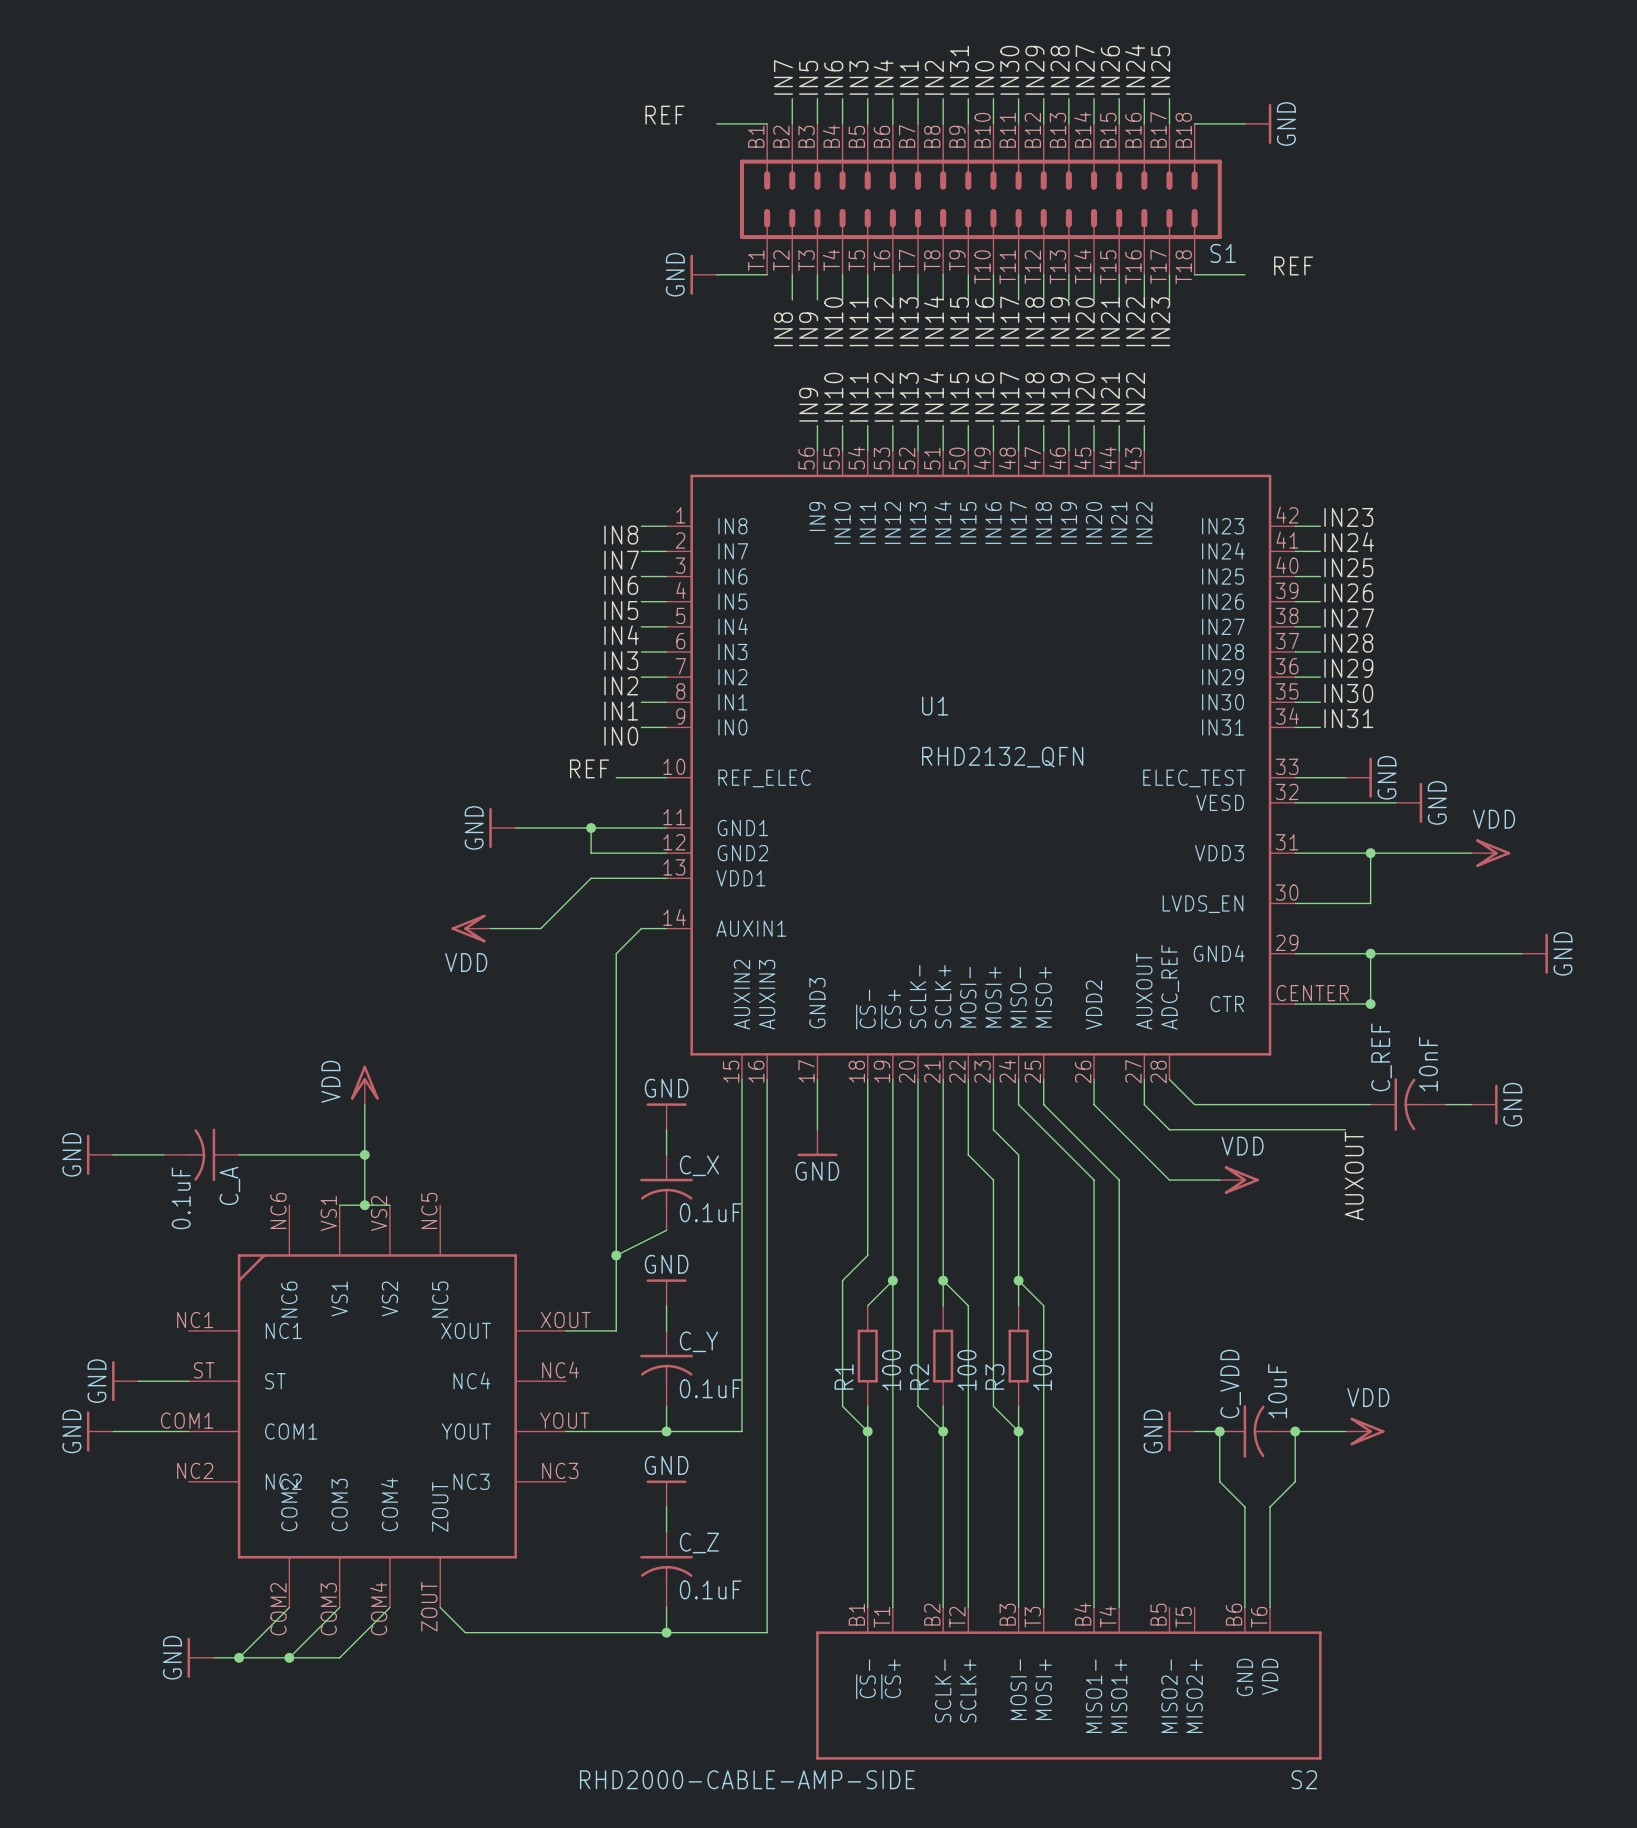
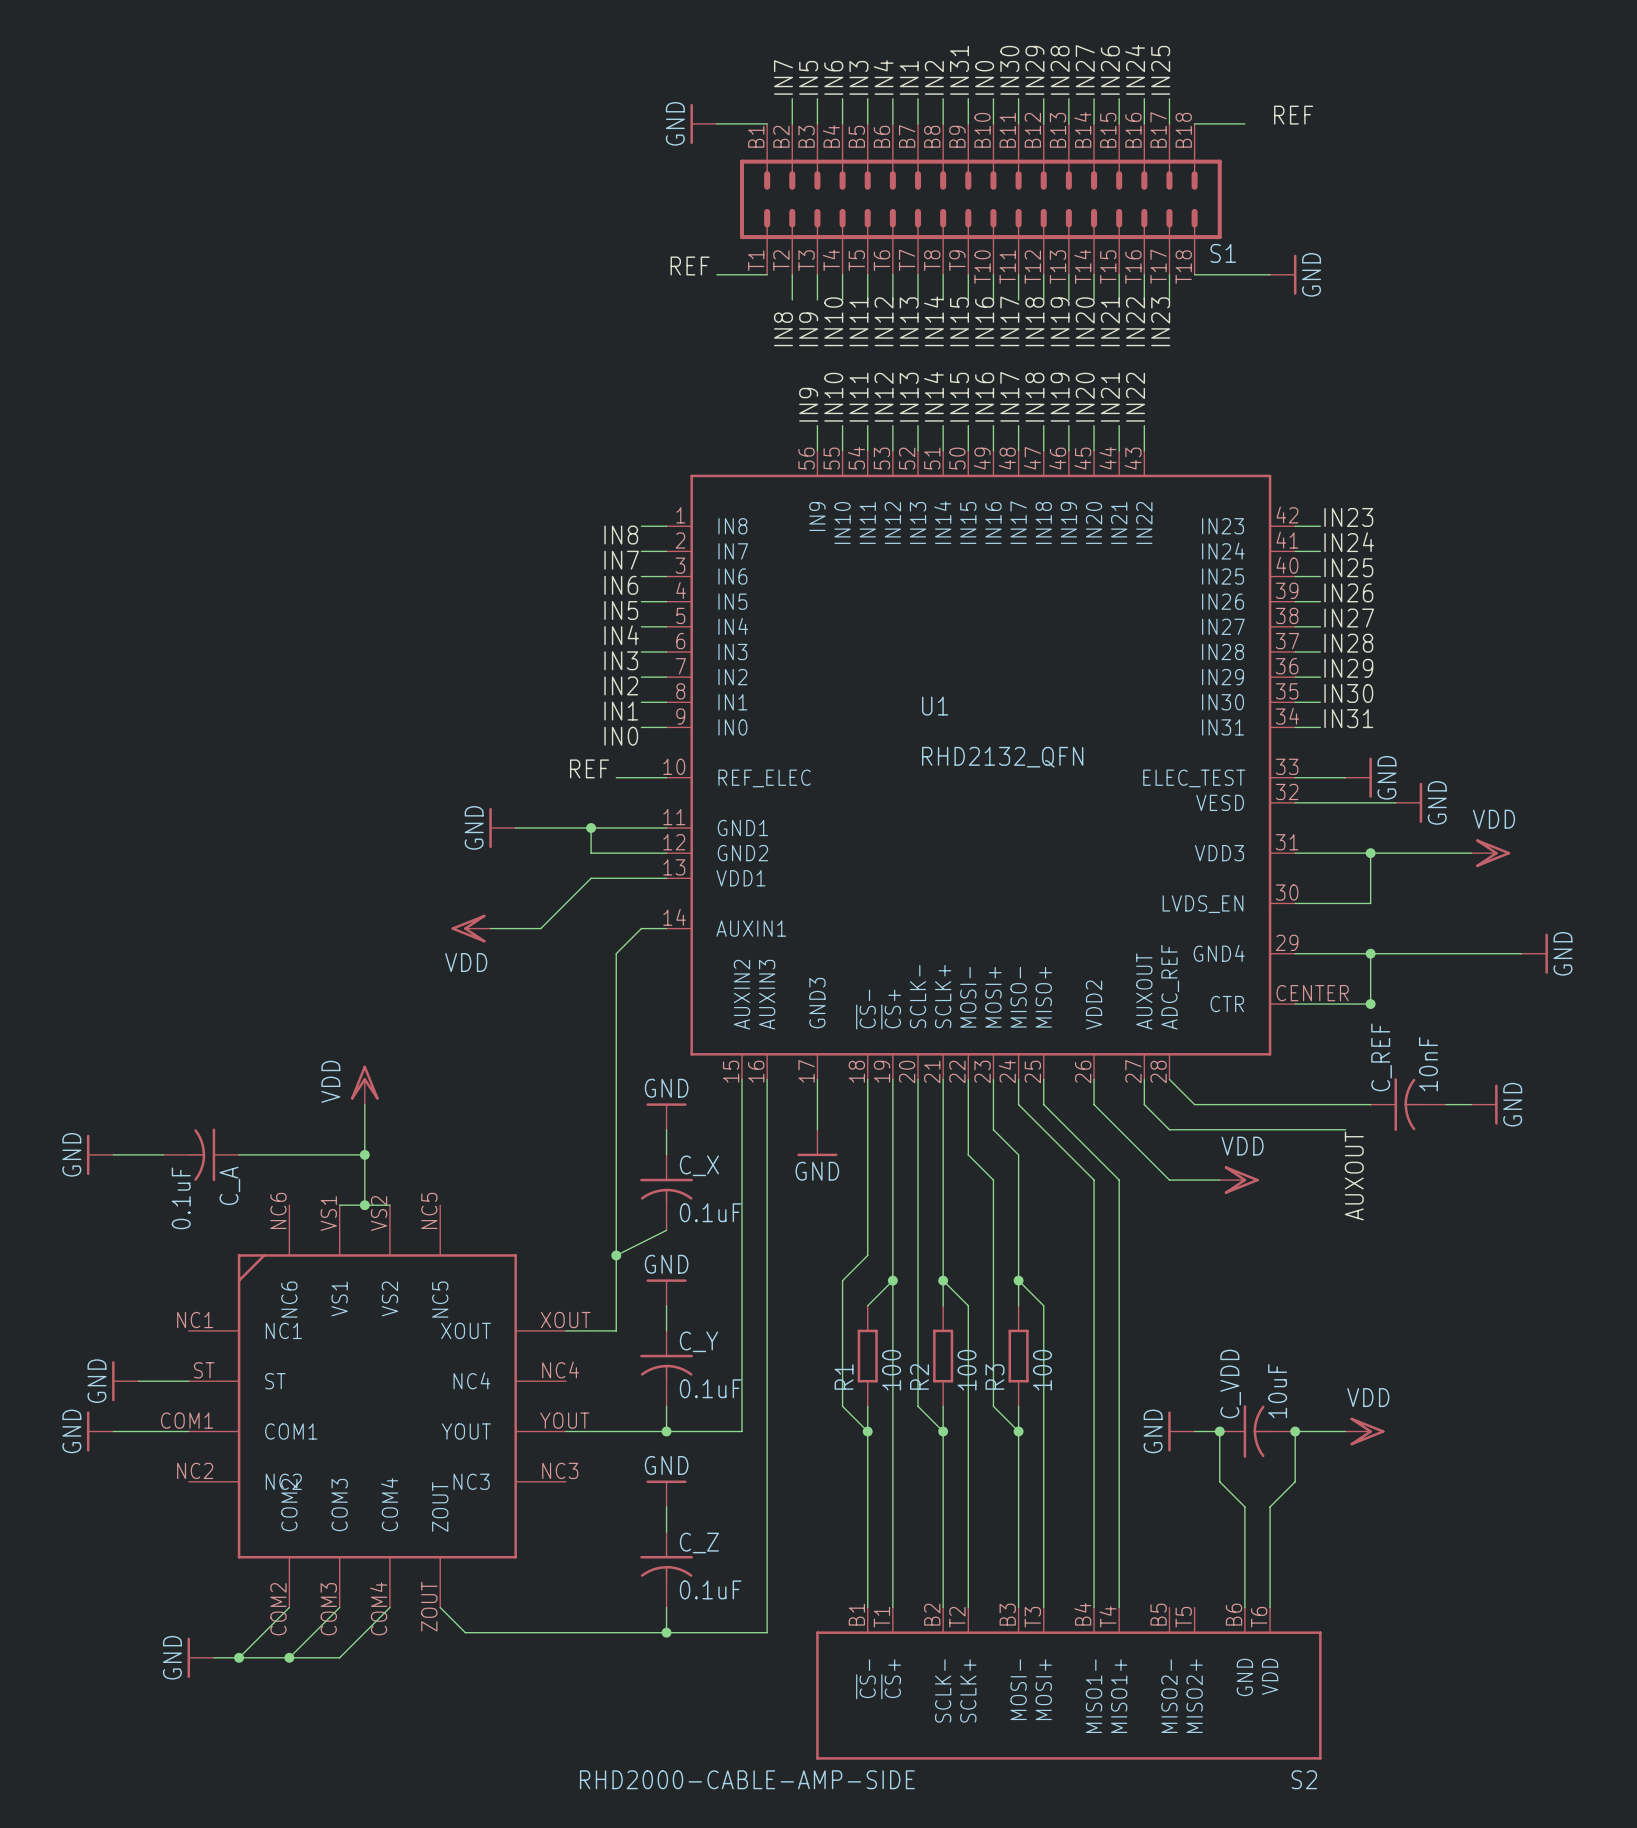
label position: REF (664, 115) -> REF (690, 265)
power symbol position: GND (1258, 123) -> GND (1283, 274)
label position: REF (1293, 265) -> REF (1293, 115)
power symbol position: GND (703, 274) -> GND (703, 123)
wire: none -> (1244, 274) (1270, 274)

